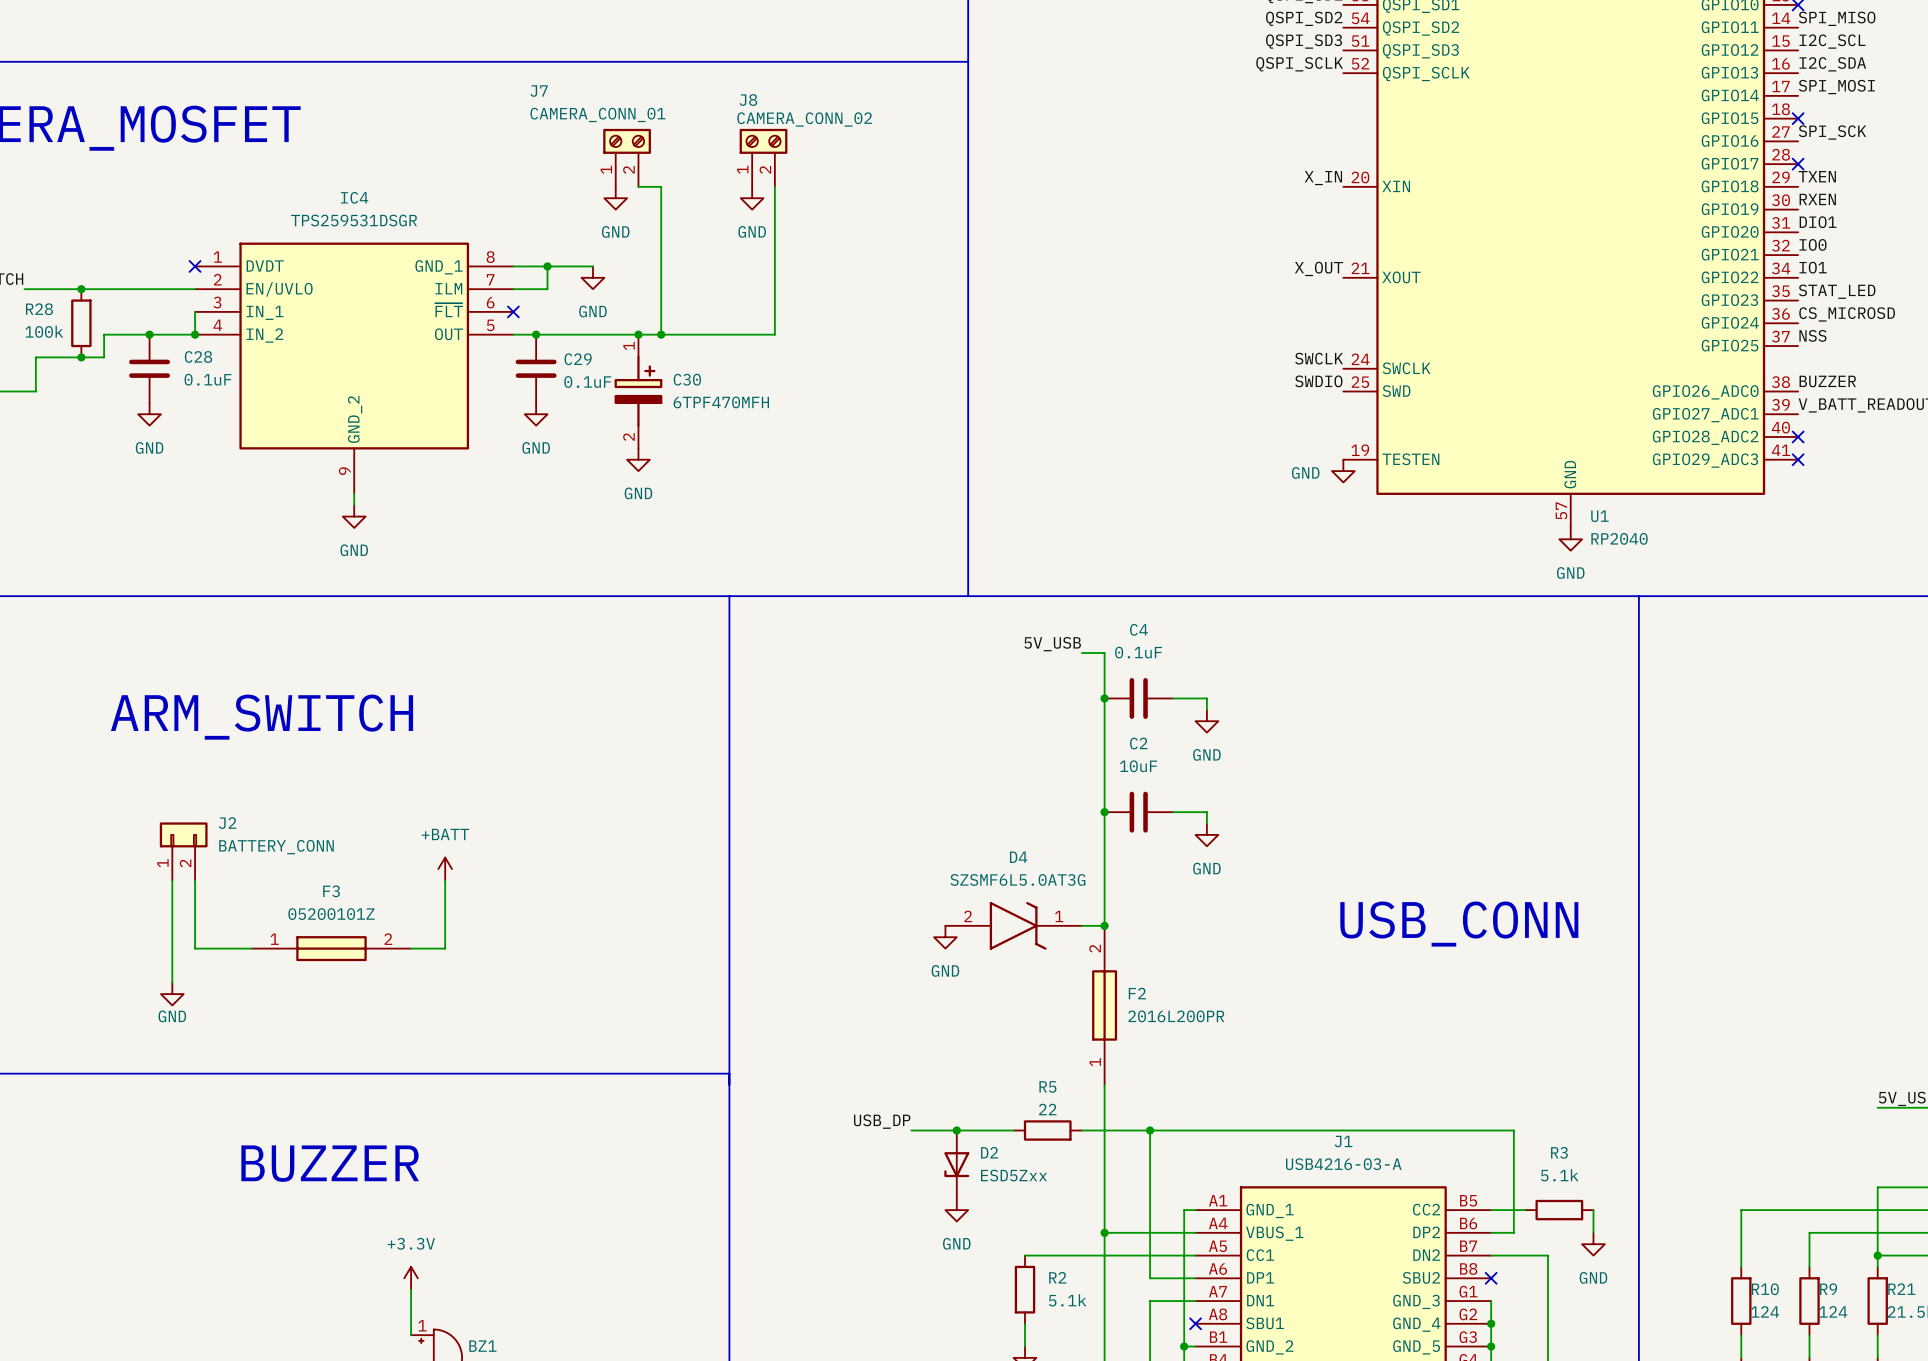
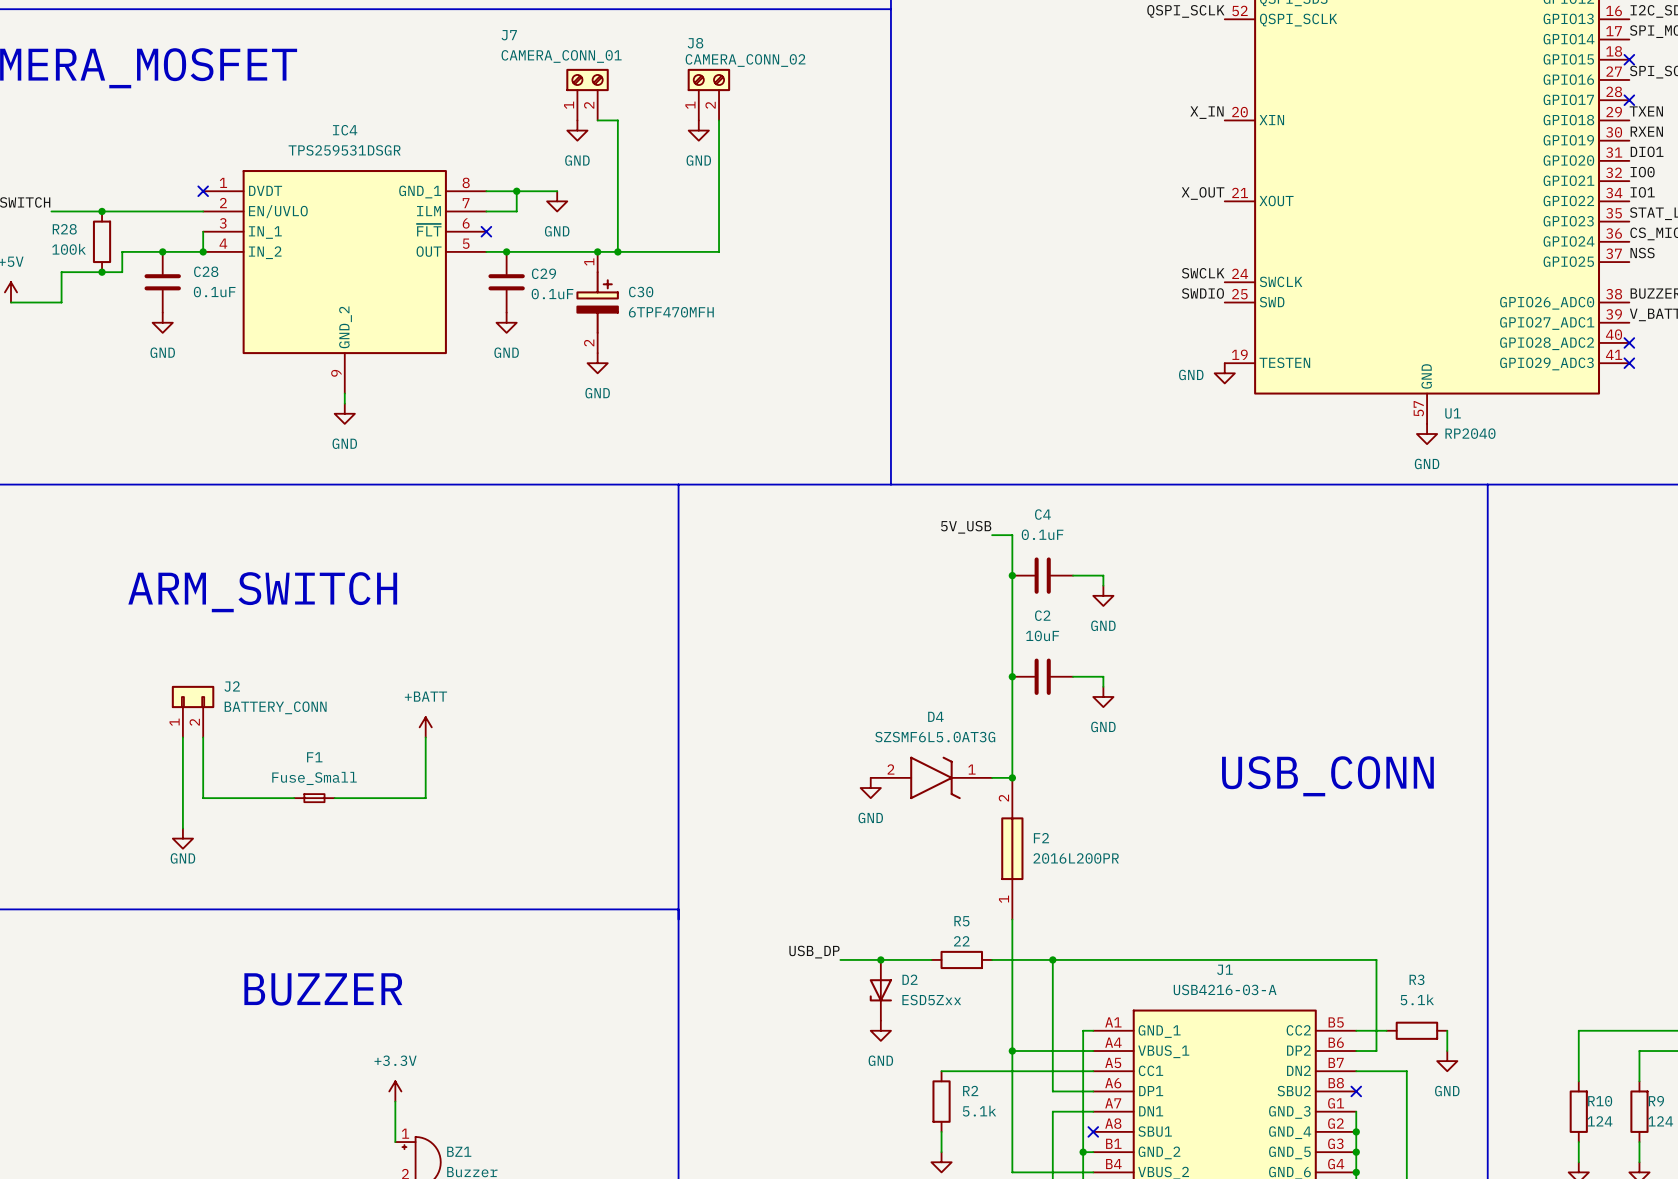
F1: none -> Fuse_Small (314, 798)
F3: 05200101Z (331, 948) -> none

